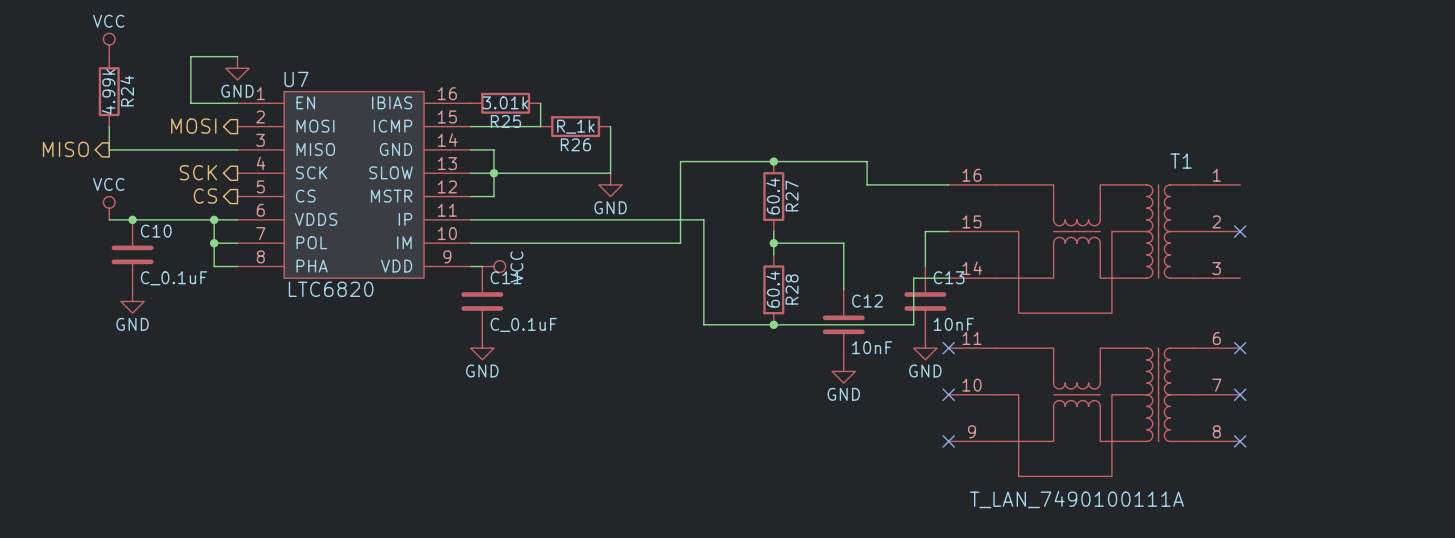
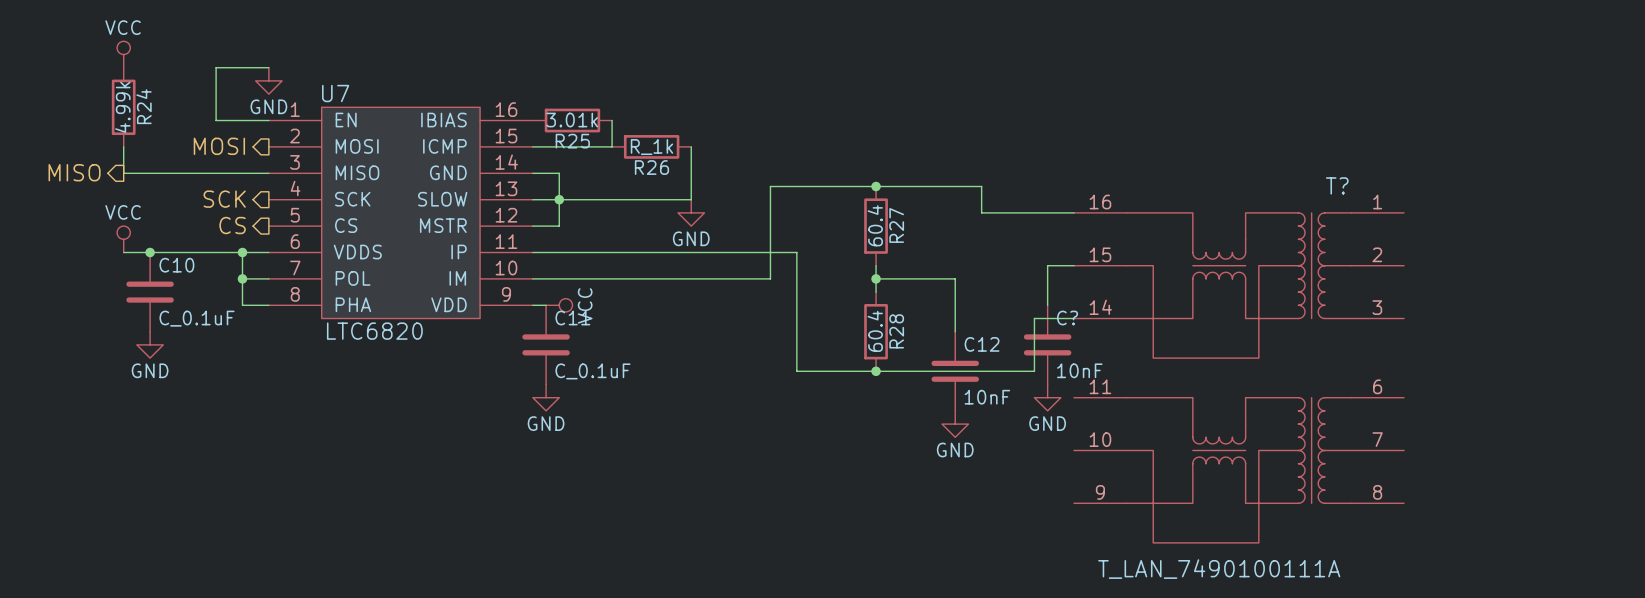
T1 name: T1 (1181, 161) -> T? (1337, 185)
no-connect mark: (1240, 231) -> none
C13 name: C13 (949, 277) -> C? (1067, 318)
no-connect mark: (948, 348) -> none
no-connect mark: (1240, 348) -> none
no-connect mark: (948, 394) -> none
no-connect mark: (1240, 394) -> none
no-connect mark: (948, 441) -> none
no-connect mark: (1240, 441) -> none

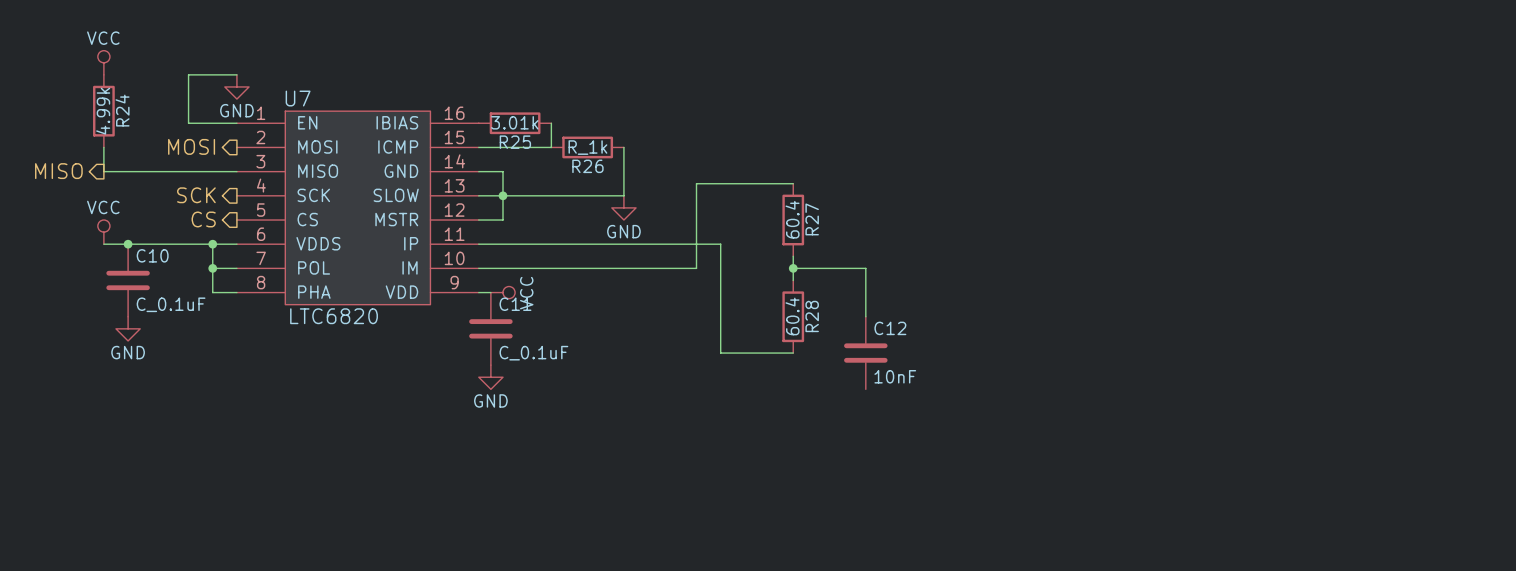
wire: (876, 186) (981, 186) (981, 212) (1074, 212) -> none
junction: (876, 186) -> none
wire: (1074, 265) (1047, 265) (1047, 305) -> none
wire: (1074, 318) (1034, 318) (1034, 371) (876, 371) -> none
C?: 10nF (1047, 344) -> none
junction: (876, 371) -> none
T?: T_LAN_7490100111A (1239, 377) -> none
power symbol: GND (1047, 397) -> none
power symbol: GND (955, 424) -> none

